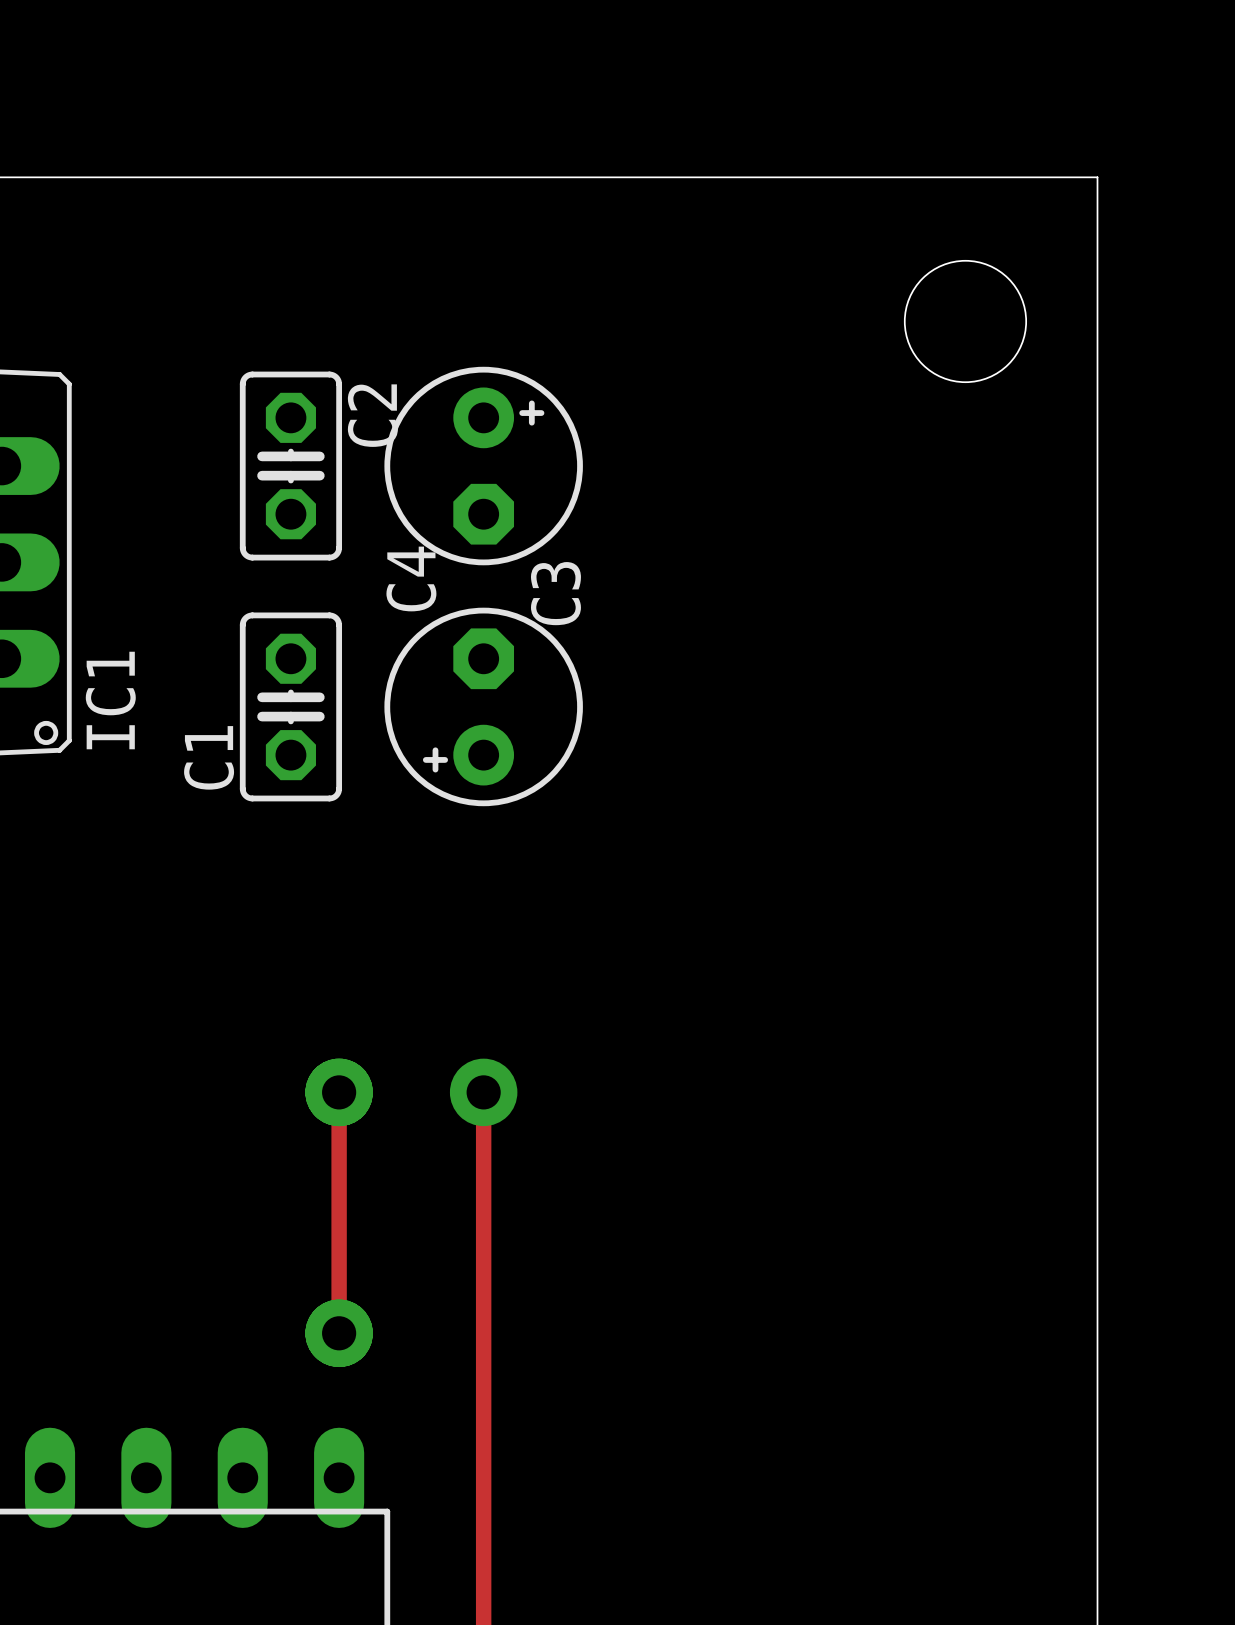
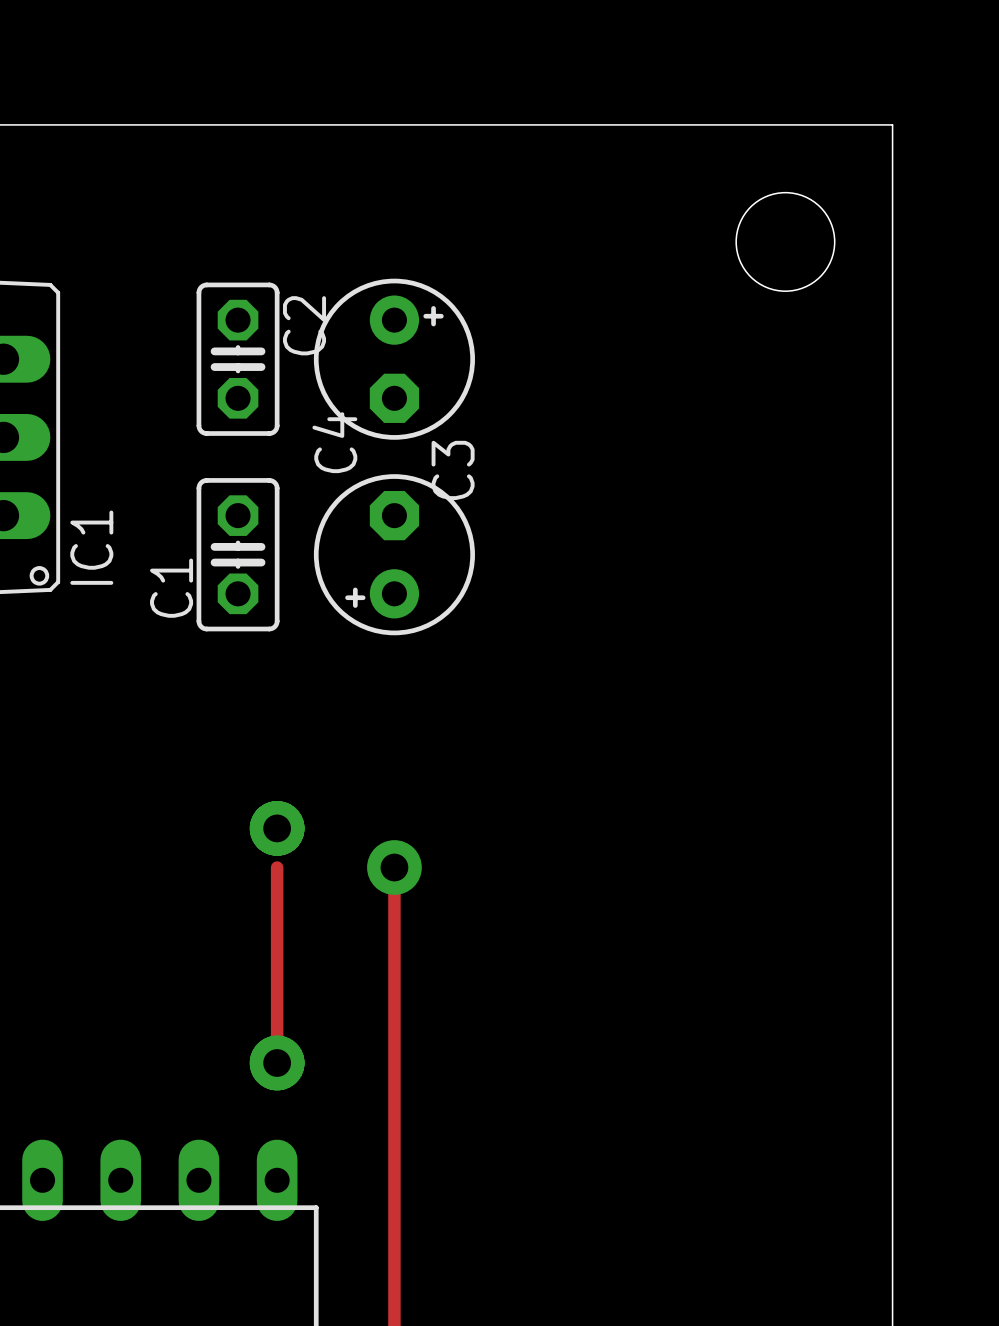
via position: (339, 1092) -> (277, 828)
via position: (339, 1092) -> (277, 828)

